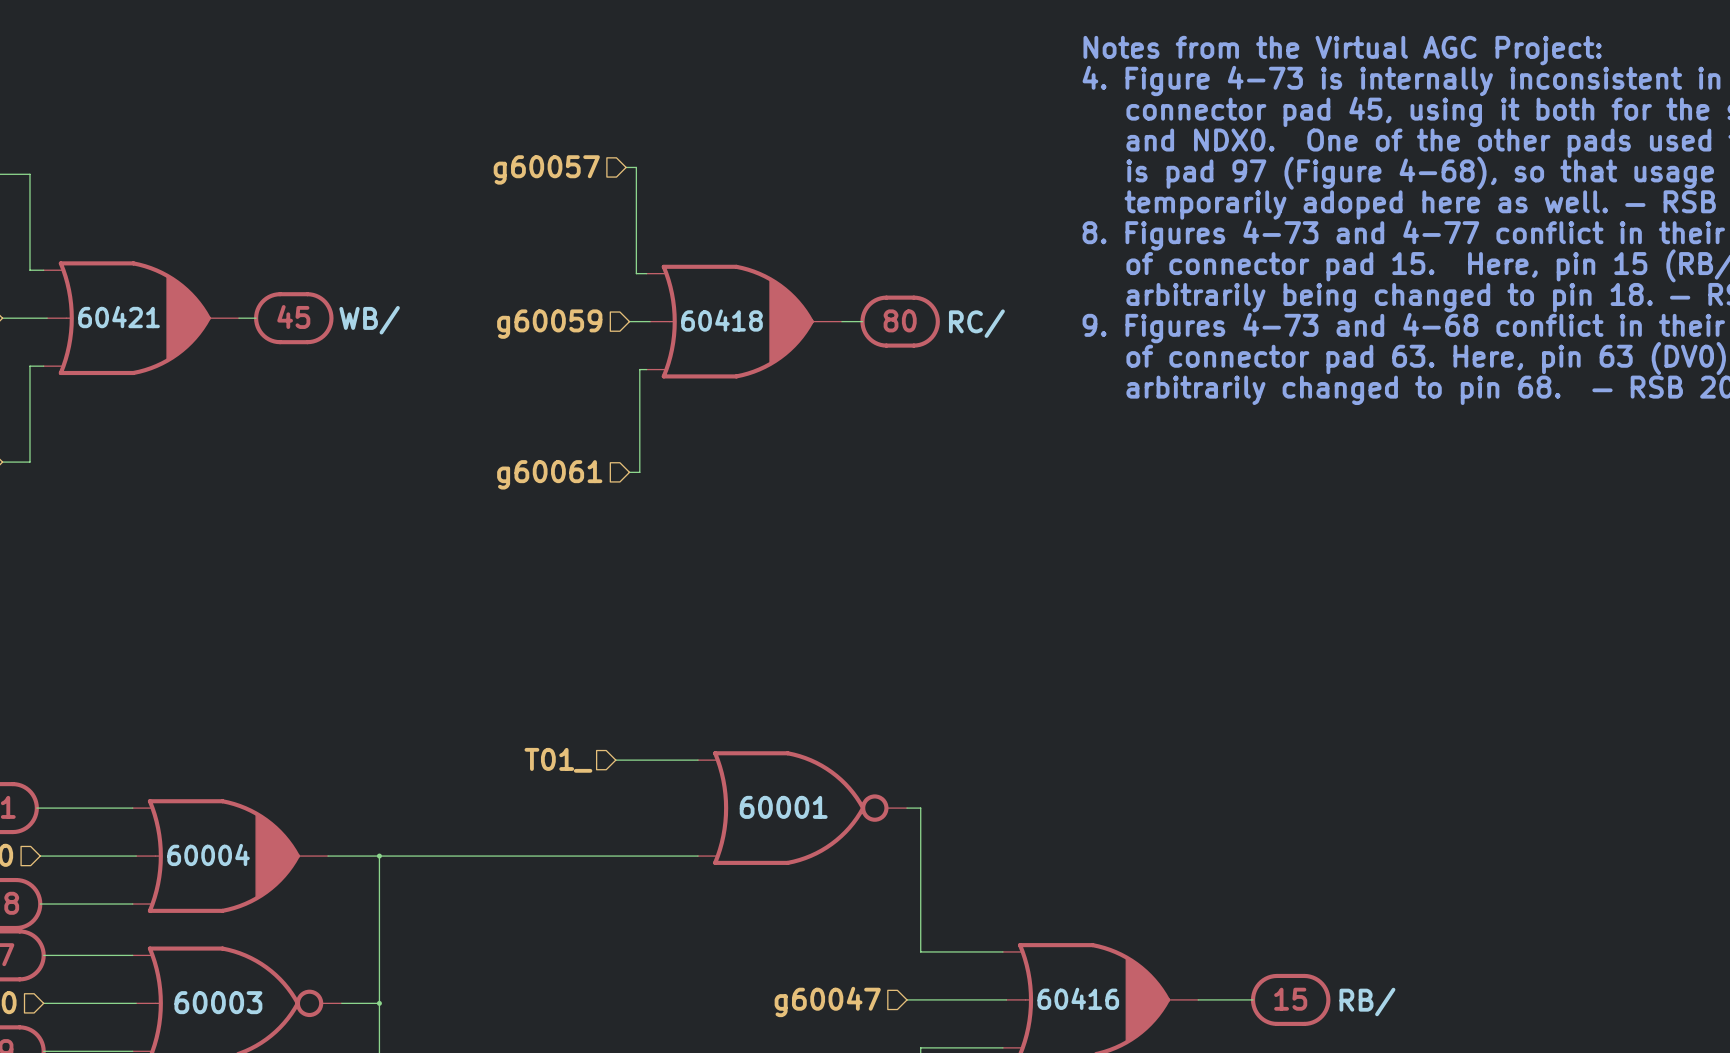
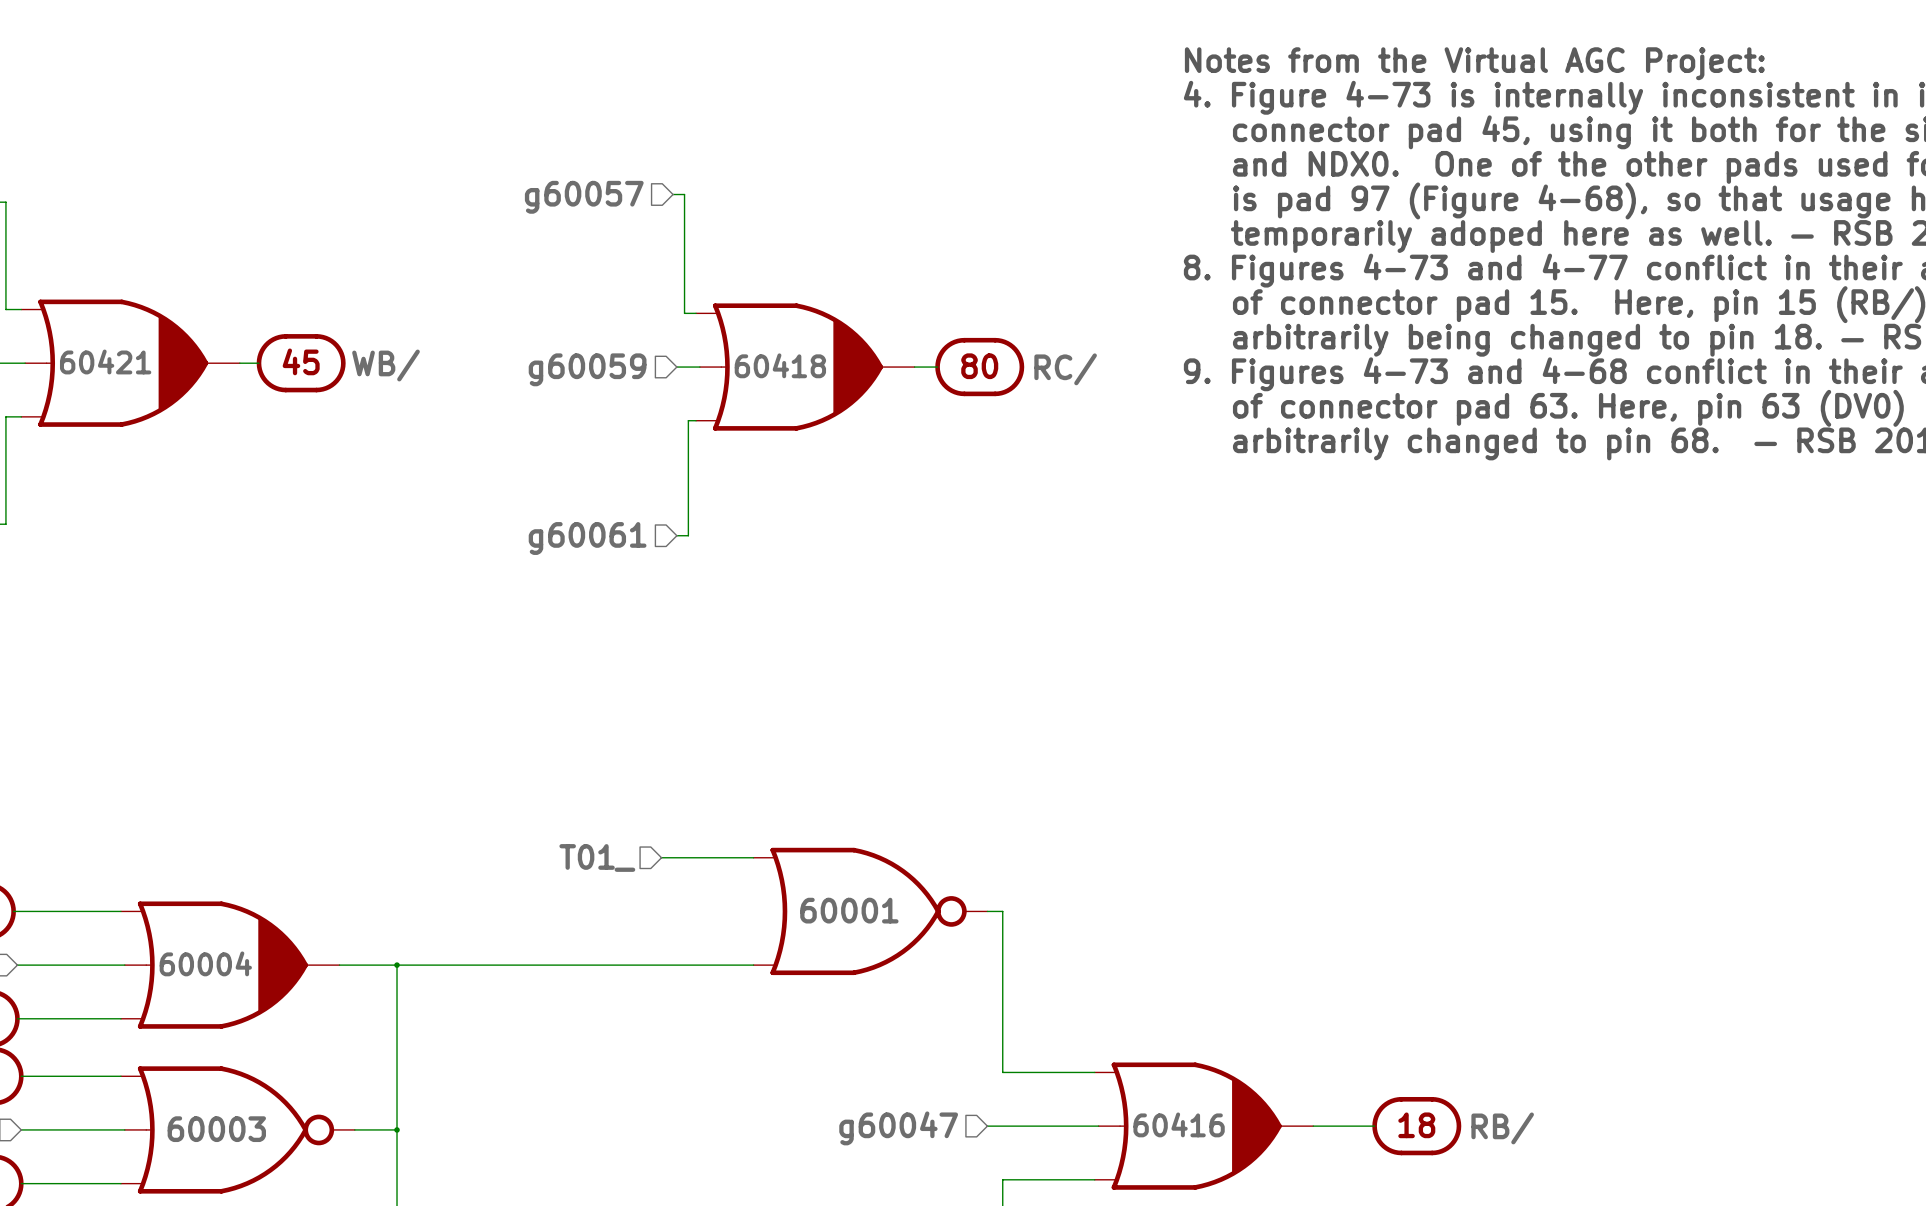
part text: 15 (1290, 999) -> 18 (1416, 1125)

